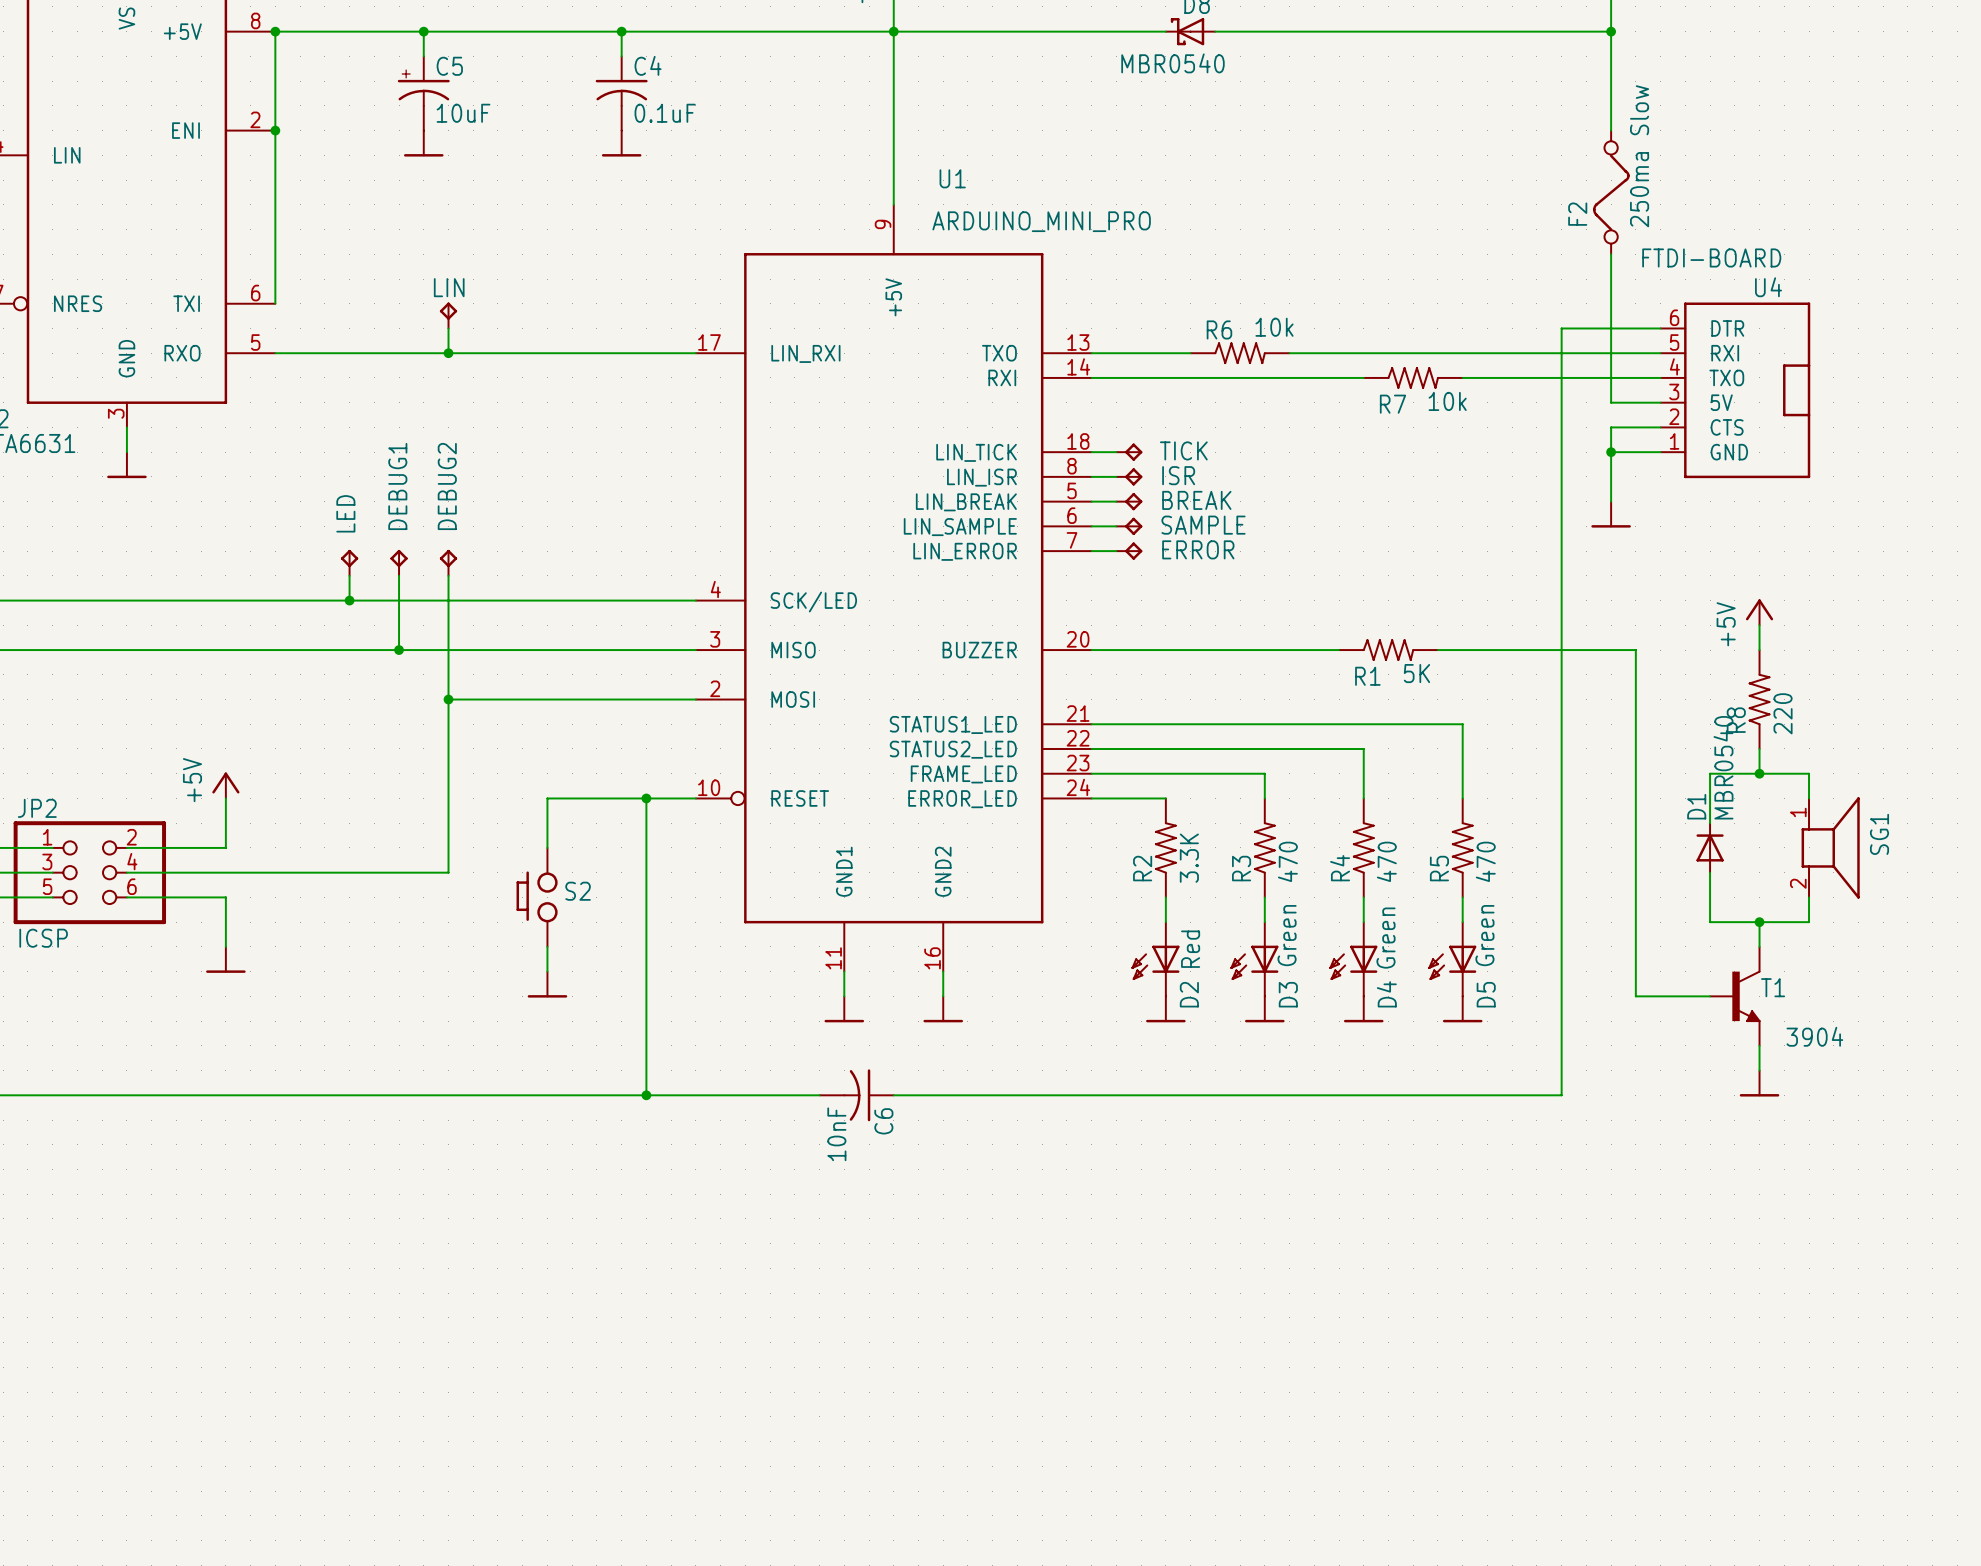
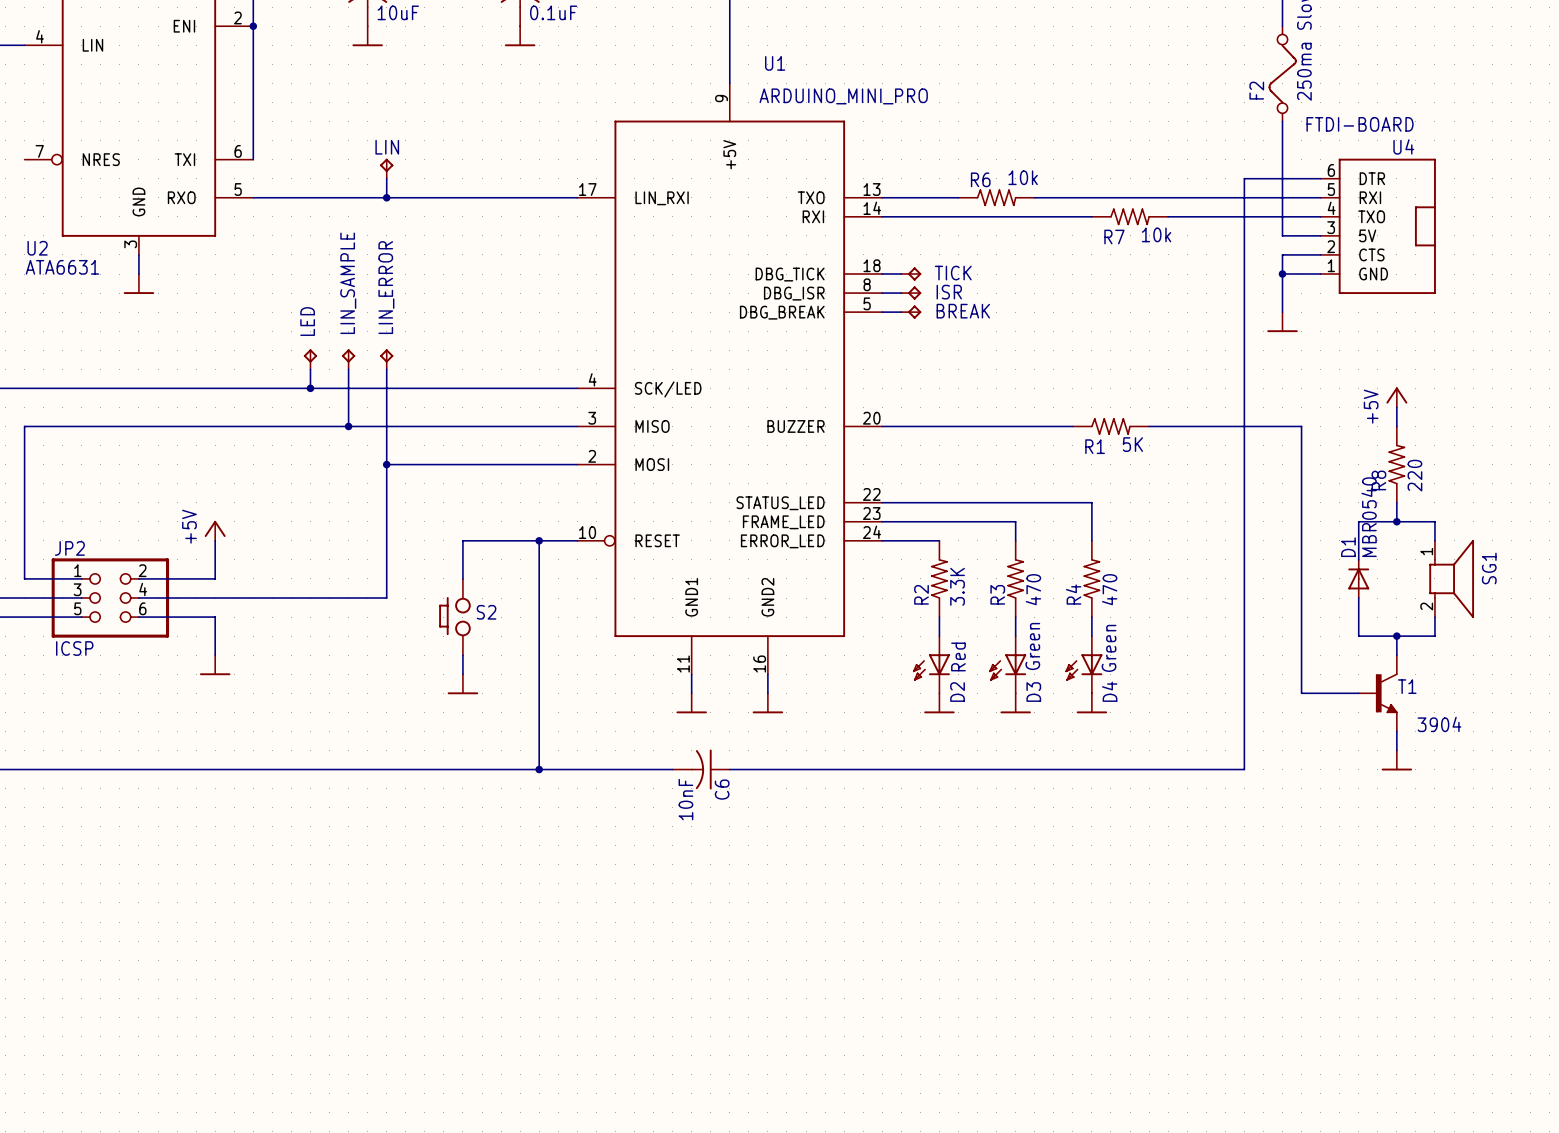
U1 symbol: [695, 204, 1092, 972] -> [577, 83, 883, 675]
DEBUG1 name: DEBUG1 (397, 486) -> LIN_SAMPLE (348, 283)
DEBUG2 name: DEBUG2 (447, 486) -> LIN_ERROR (386, 287)
wire: (1091, 526) (1116, 526) -> none
SAMPLE: (1129, 526) -> none
wire: (1091, 551) (1116, 551) -> none
ERROR: (1129, 551) -> none
wire: (1091, 724) (1462, 724) (1462, 798) -> none
R5: 470 (1462, 847) -> none
wire: (1462, 897) (1462, 922) -> none
D5: Green (1452, 958) -> none
power symbol: (1462, 1009) -> none

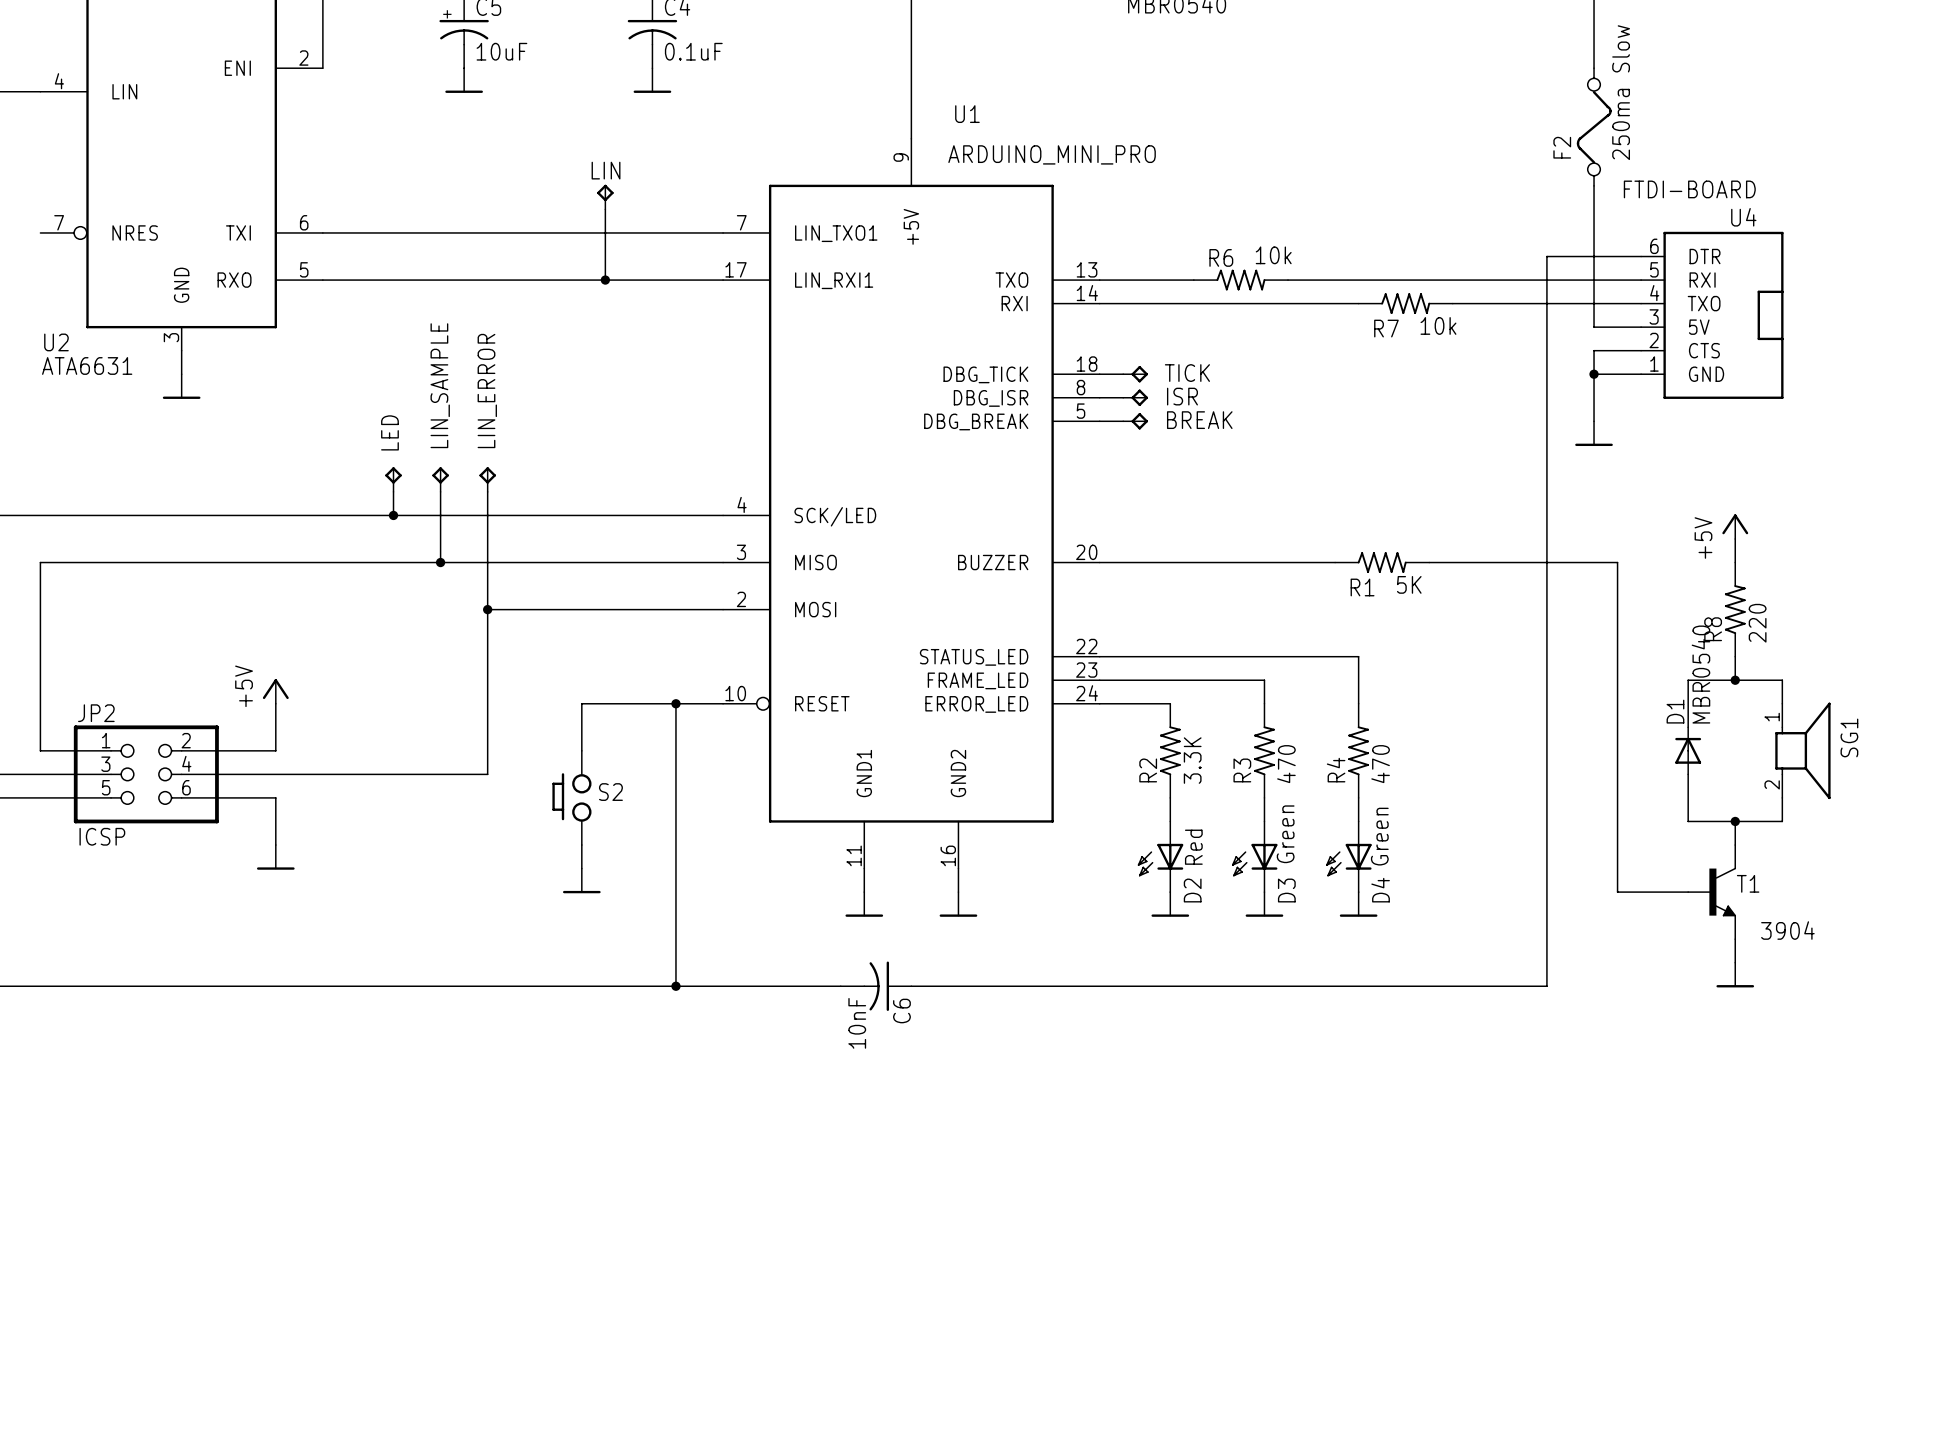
wire: (253, 26) (253, 159) -> (723, 232) (322, 232)
junction: (253, 26) -> none
U1 symbol: [577, 83, 883, 675] -> [723, 138, 1100, 869]
wire: none -> (605, 209) (605, 280)
LIN position: (386, 168) -> (605, 197)
wire: (386, 178) (386, 197) -> none
junction: (386, 197) -> none
junction: none -> (605, 280)

